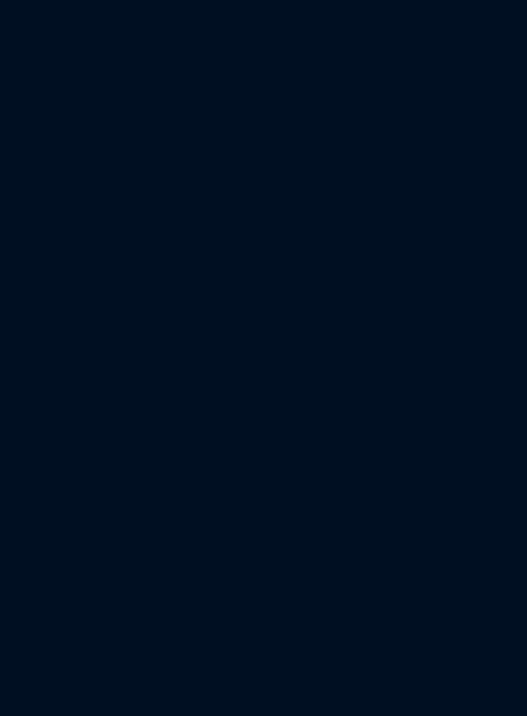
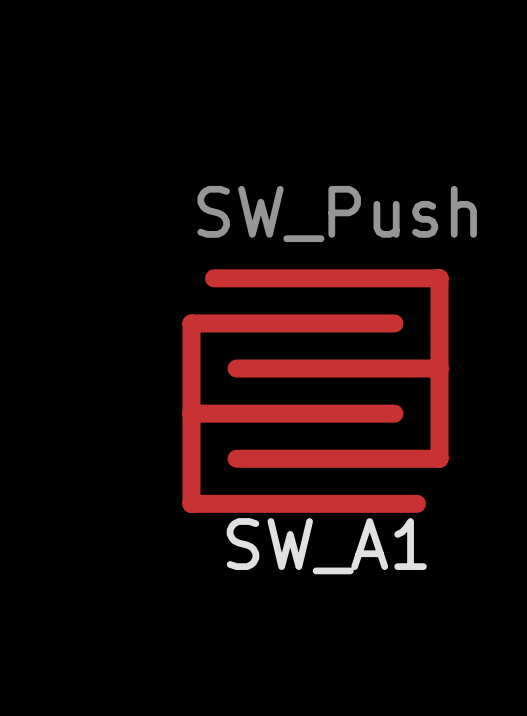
SW_A1: none -> SW_Push (315, 391)

